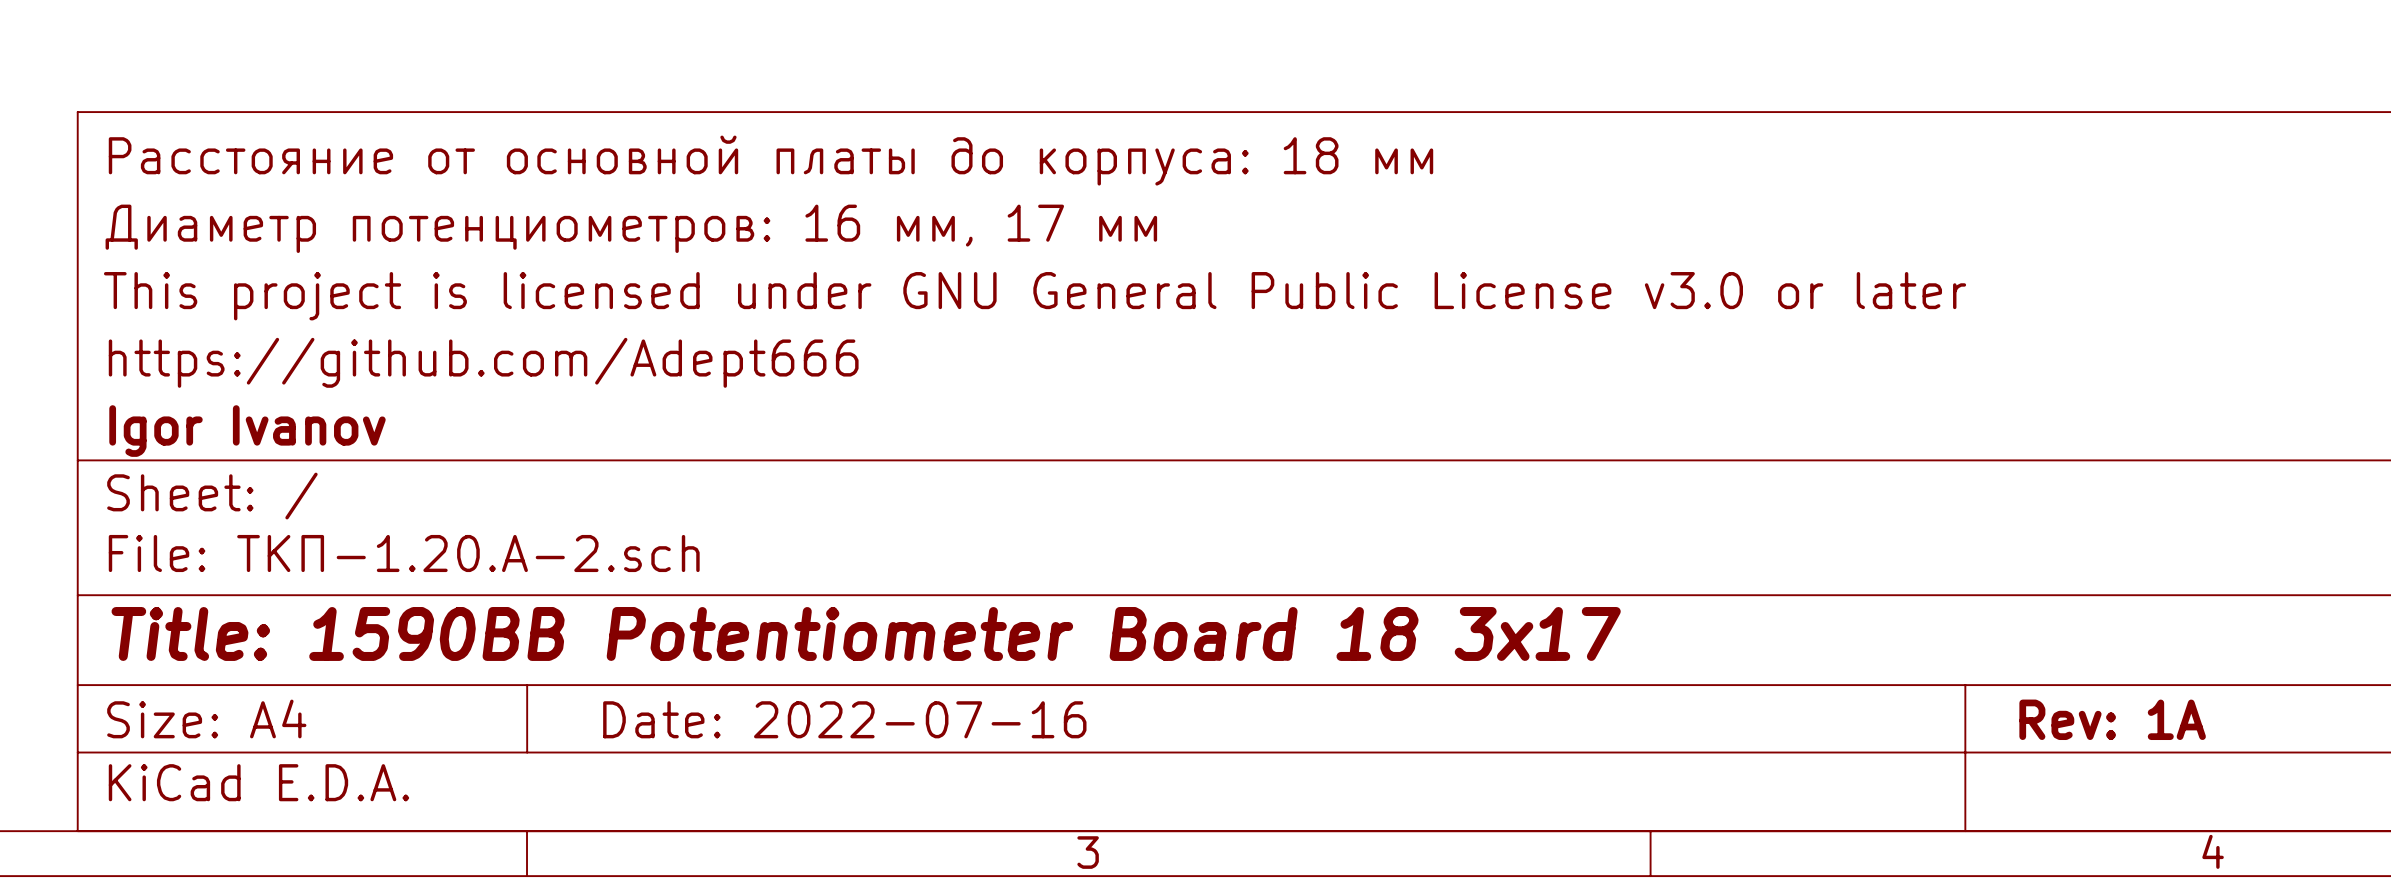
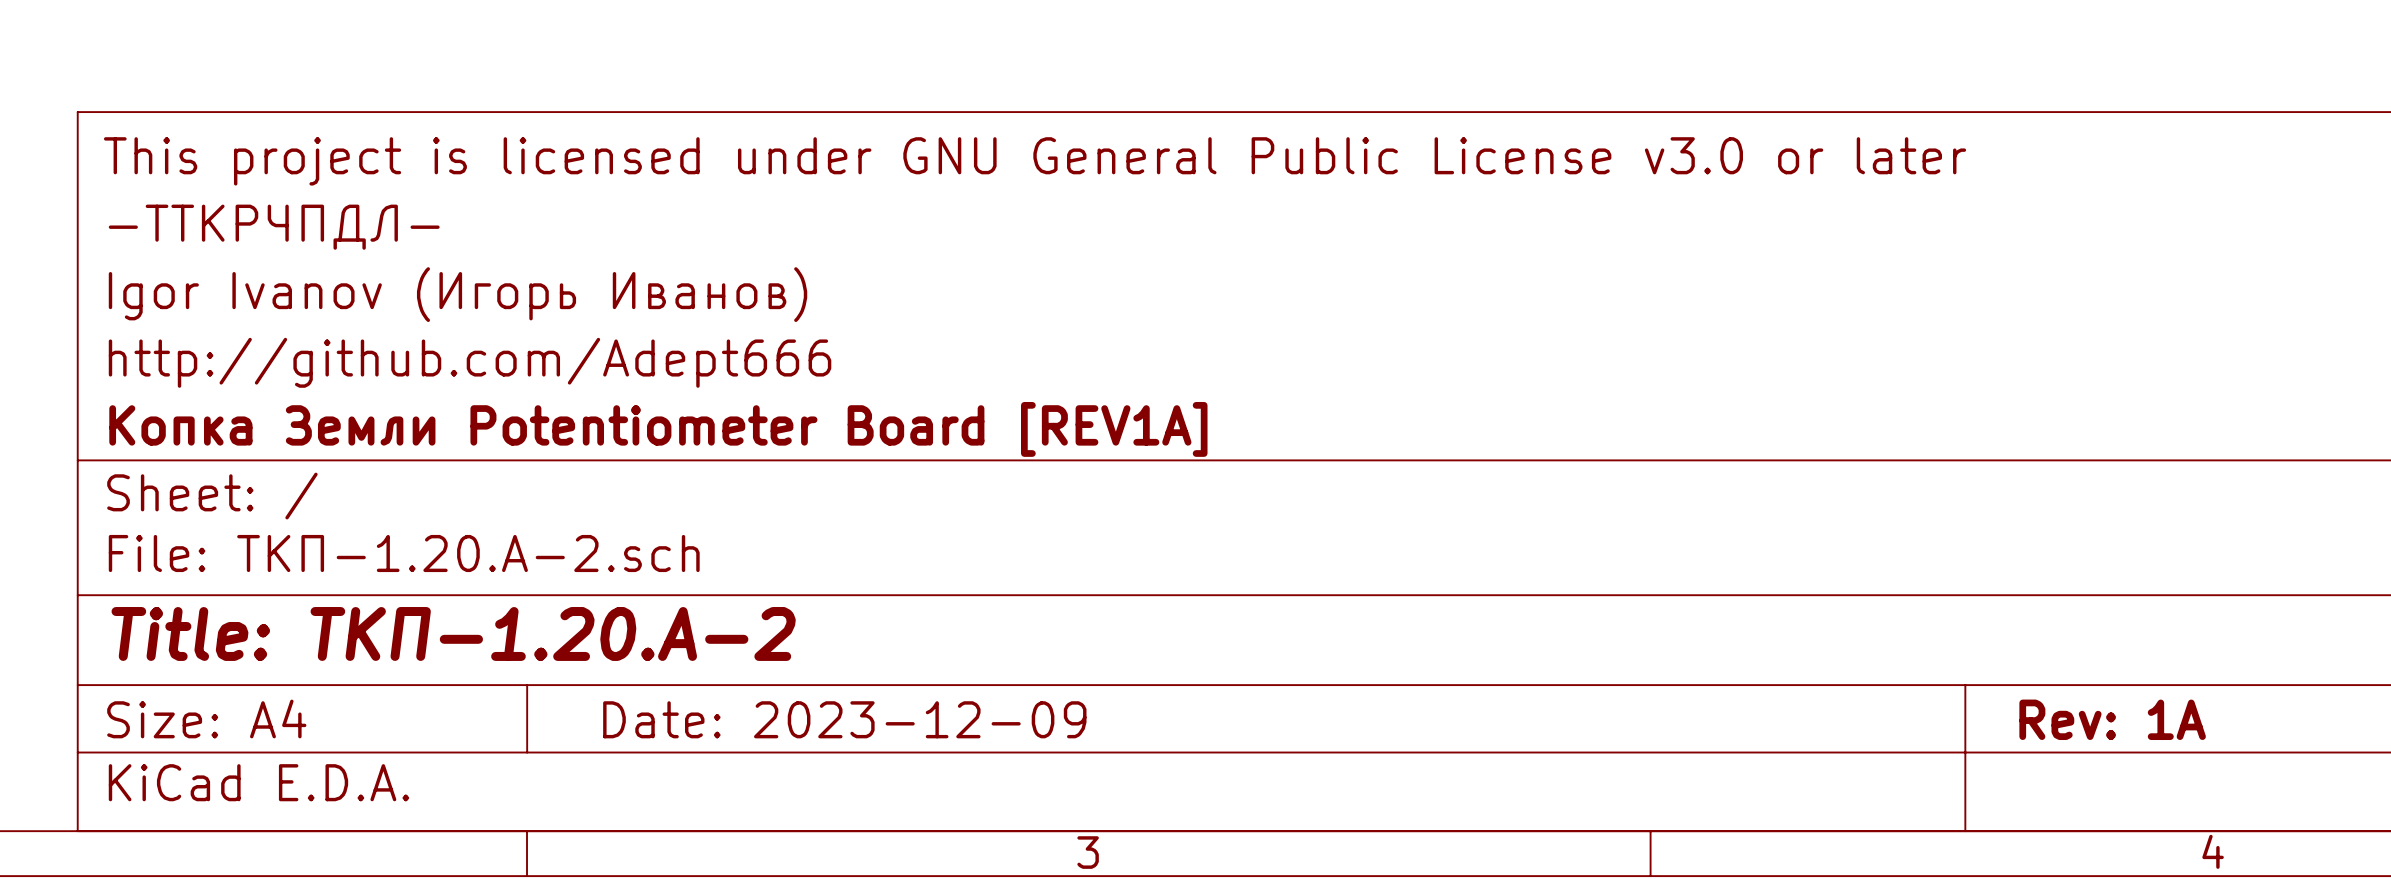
title block: Расстояние от основной платы до корпуса: 18 мм (770, 160) -> This project is licensed under GNU General Public License v3.0 or later (1035, 161)
title block: Диаметр потенциометров: 16 мм, 17 мм (631, 228) -> -ТТКРЧПДЛ- (274, 227)
title block: This project is licensed under GNU General Public License v3.0 or later (1035, 296) -> Igor Ivanov (Игорь Иванов) (457, 294)
title block: https://github.com/Adept666 (483, 362) -> http://github.com/Adept666 (470, 362)
title block: Igor Ivanov (247, 431) -> Копка Земли Potentiometer Board [REV1A] (658, 429)
title block: Title: 1590BB Potentiometer Board 18 3x17 (866, 633) -> Title: ТКП-1.20.A-2 (453, 633)
title block: Date: 2022-07-16 (844, 719) -> Date: 2023-12-09 (844, 719)

